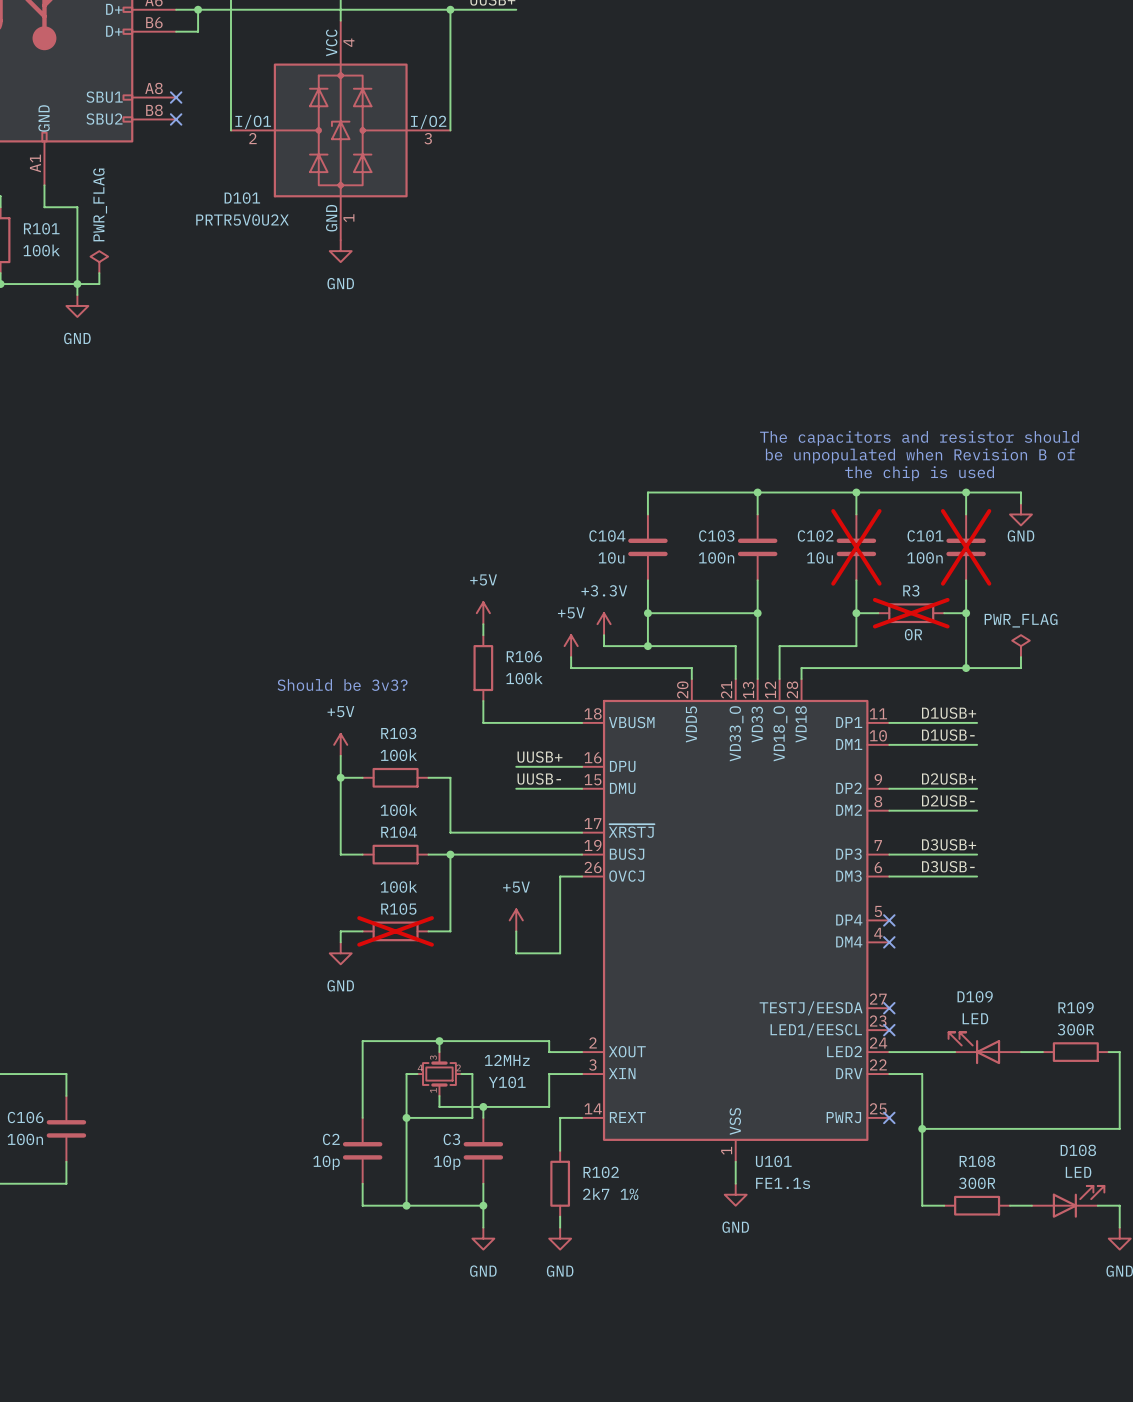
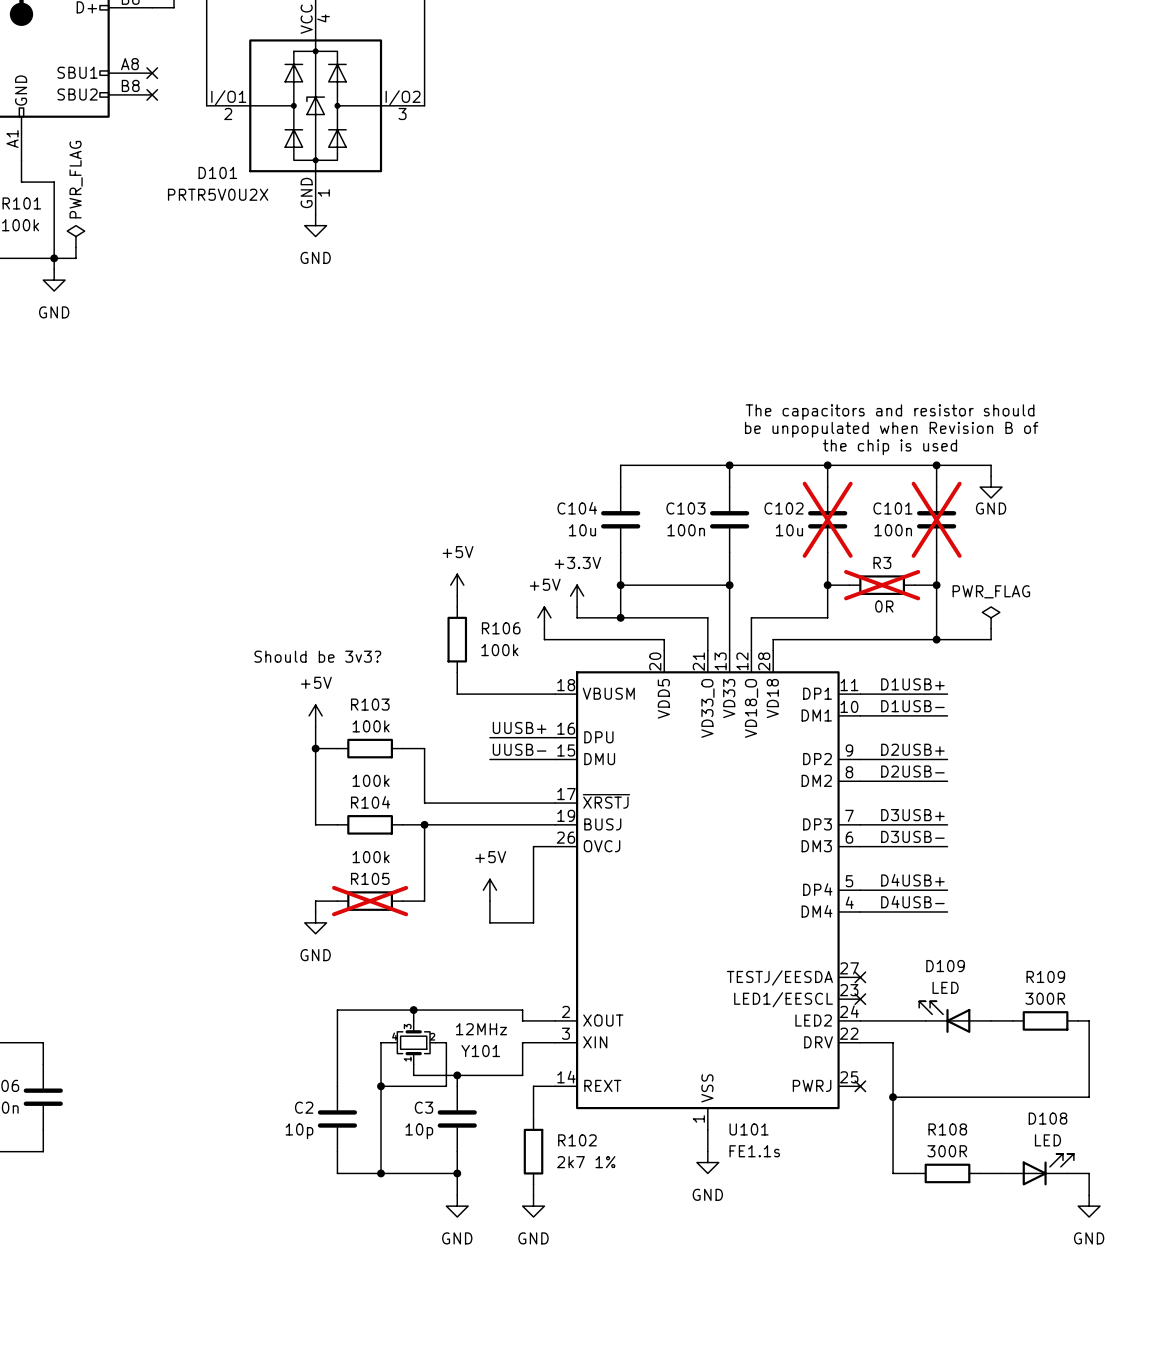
label: none -> D4USB+ (912, 880)
wire: none -> (860, 890) (947, 890)
no-connect mark: (889, 920) -> none
label: none -> D4USB- (912, 902)
wire: none -> (860, 911) (947, 911)
no-connect mark: (889, 942) -> none

